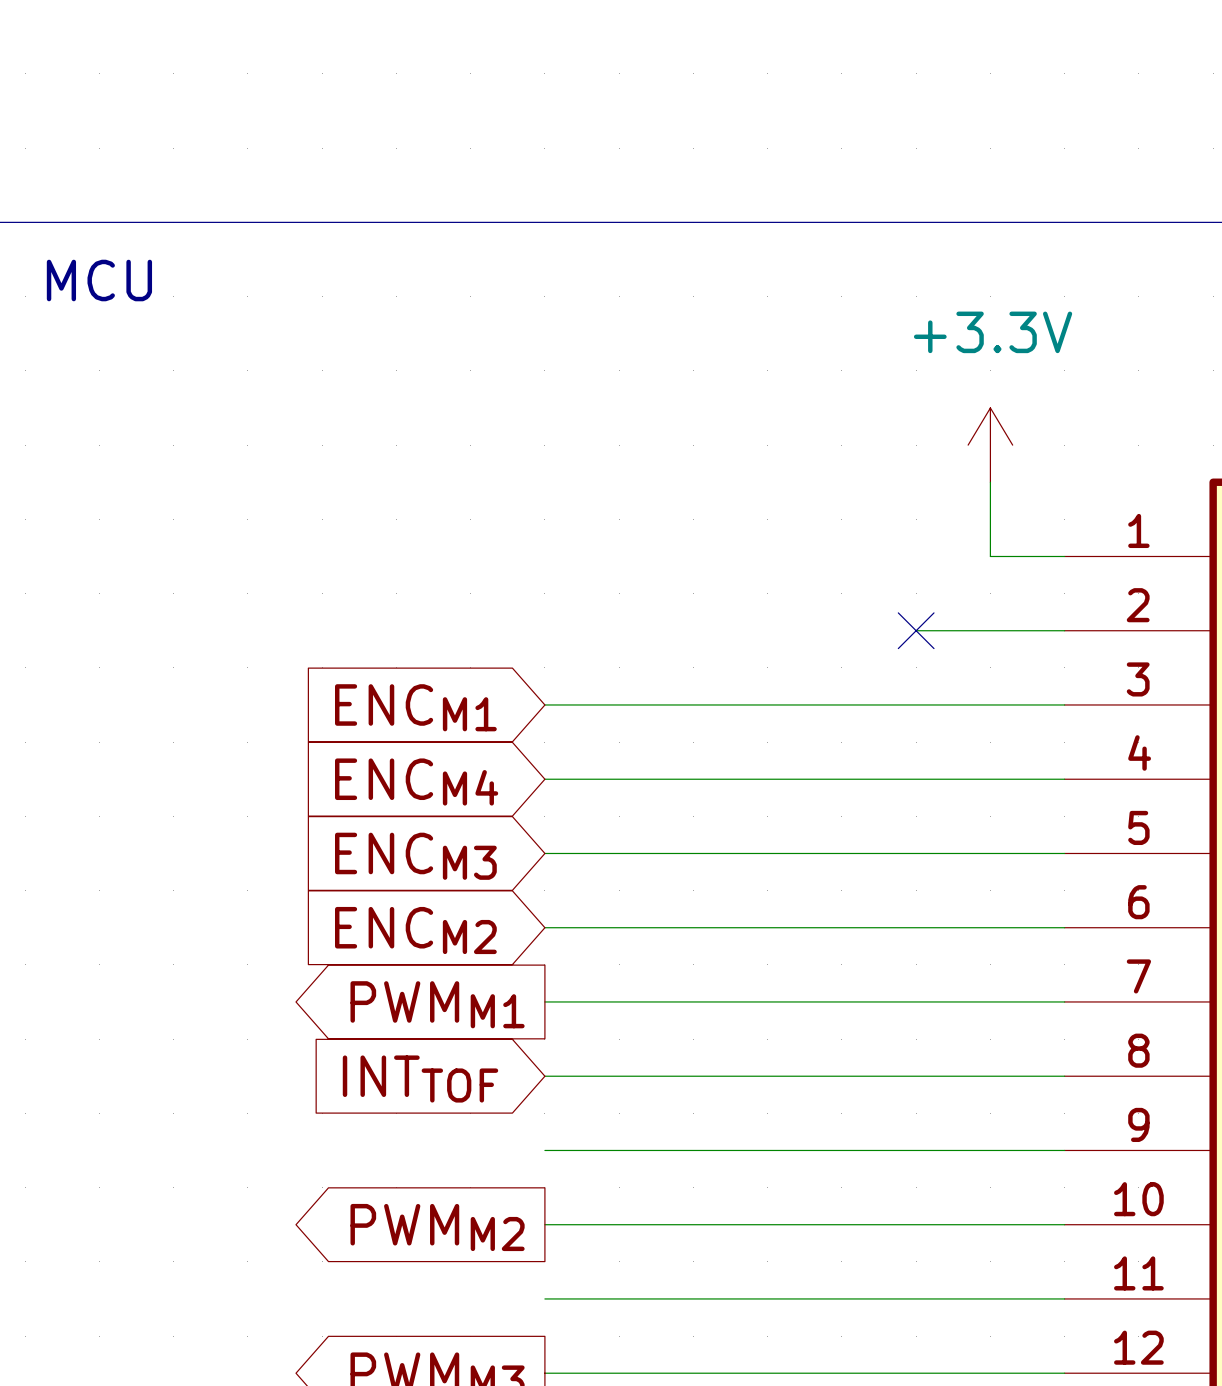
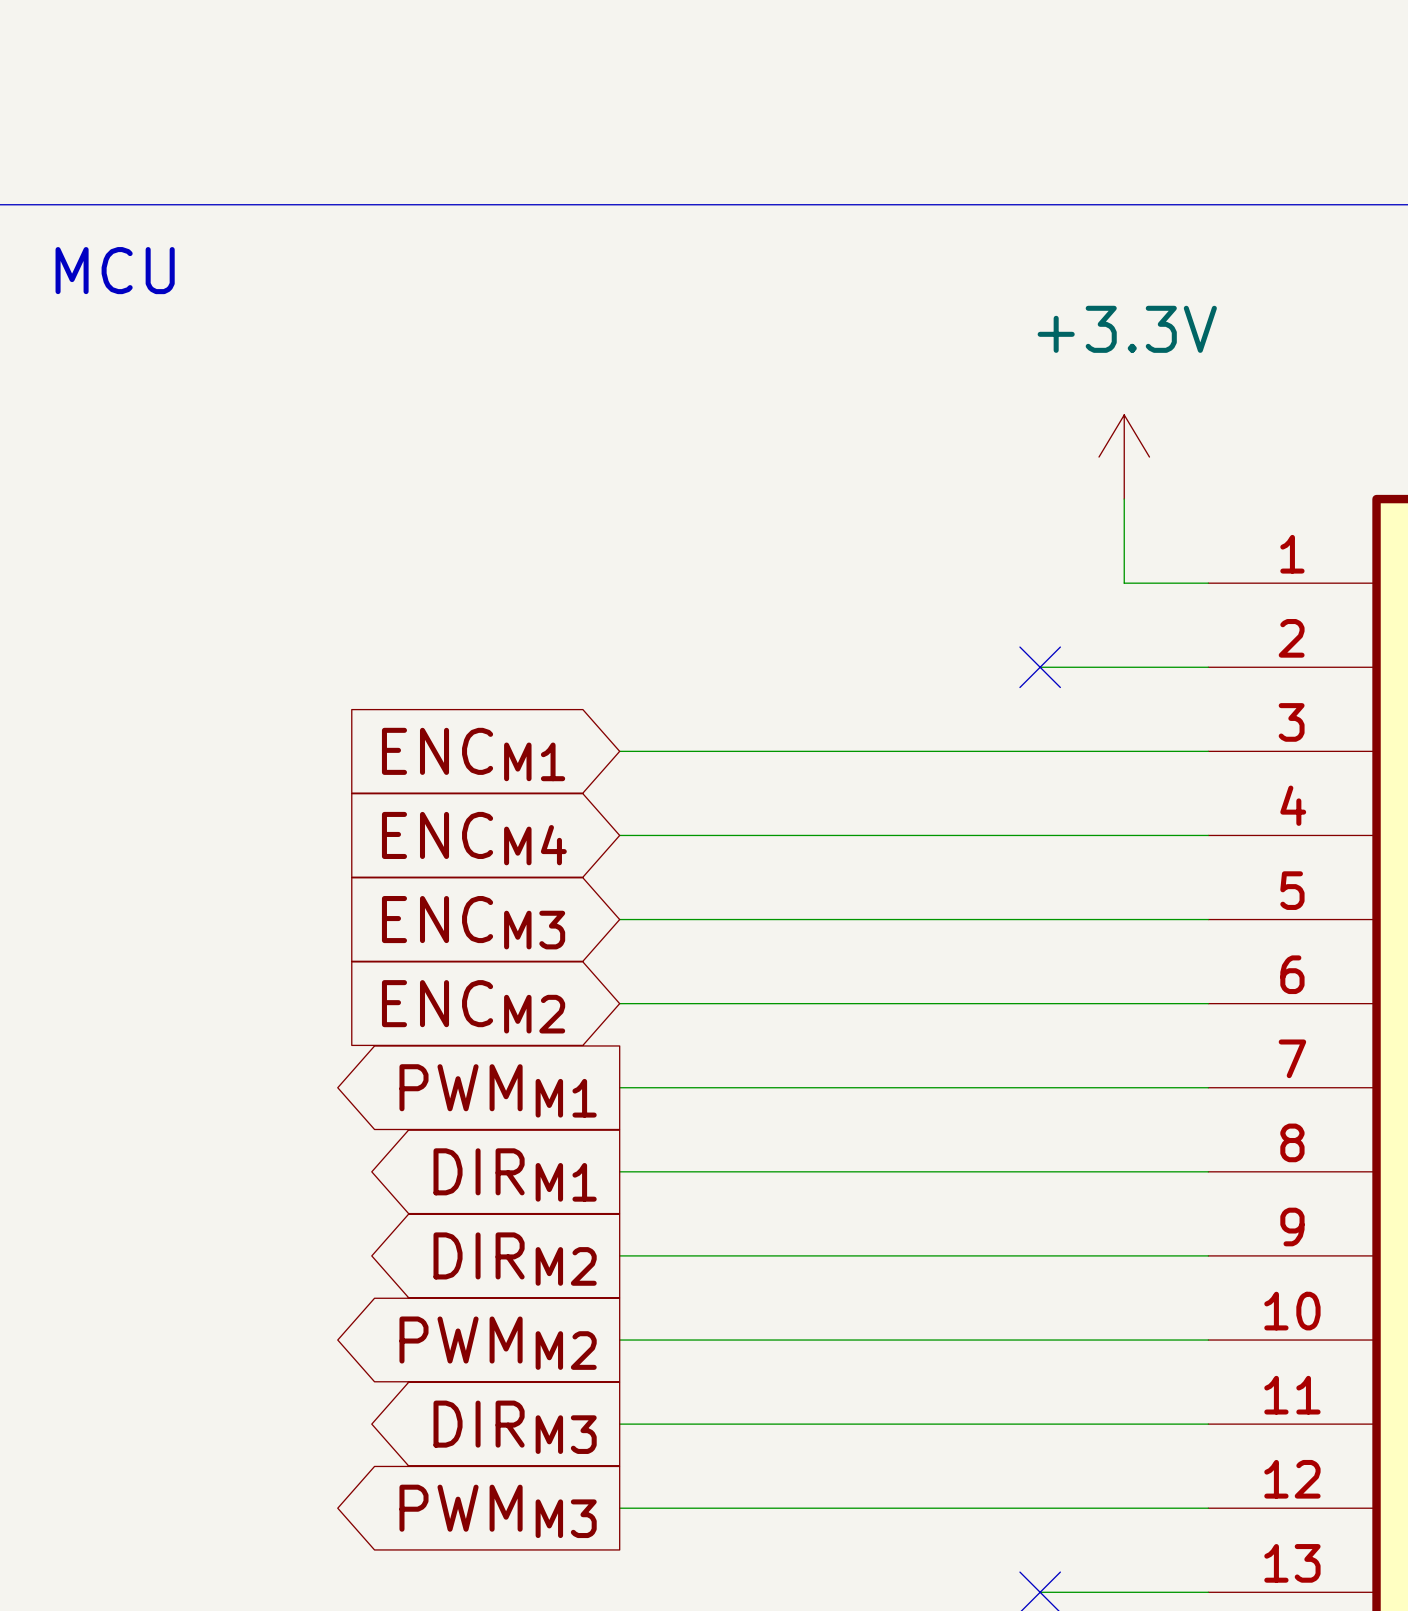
global label shape: input (420, 1079) -> output (515, 1174)
global label: INTTOF (420, 1079) -> DIRM1 (515, 1174)
global label: none -> DIRM2 (515, 1259)
global label: none -> DIRM3 (515, 1427)

